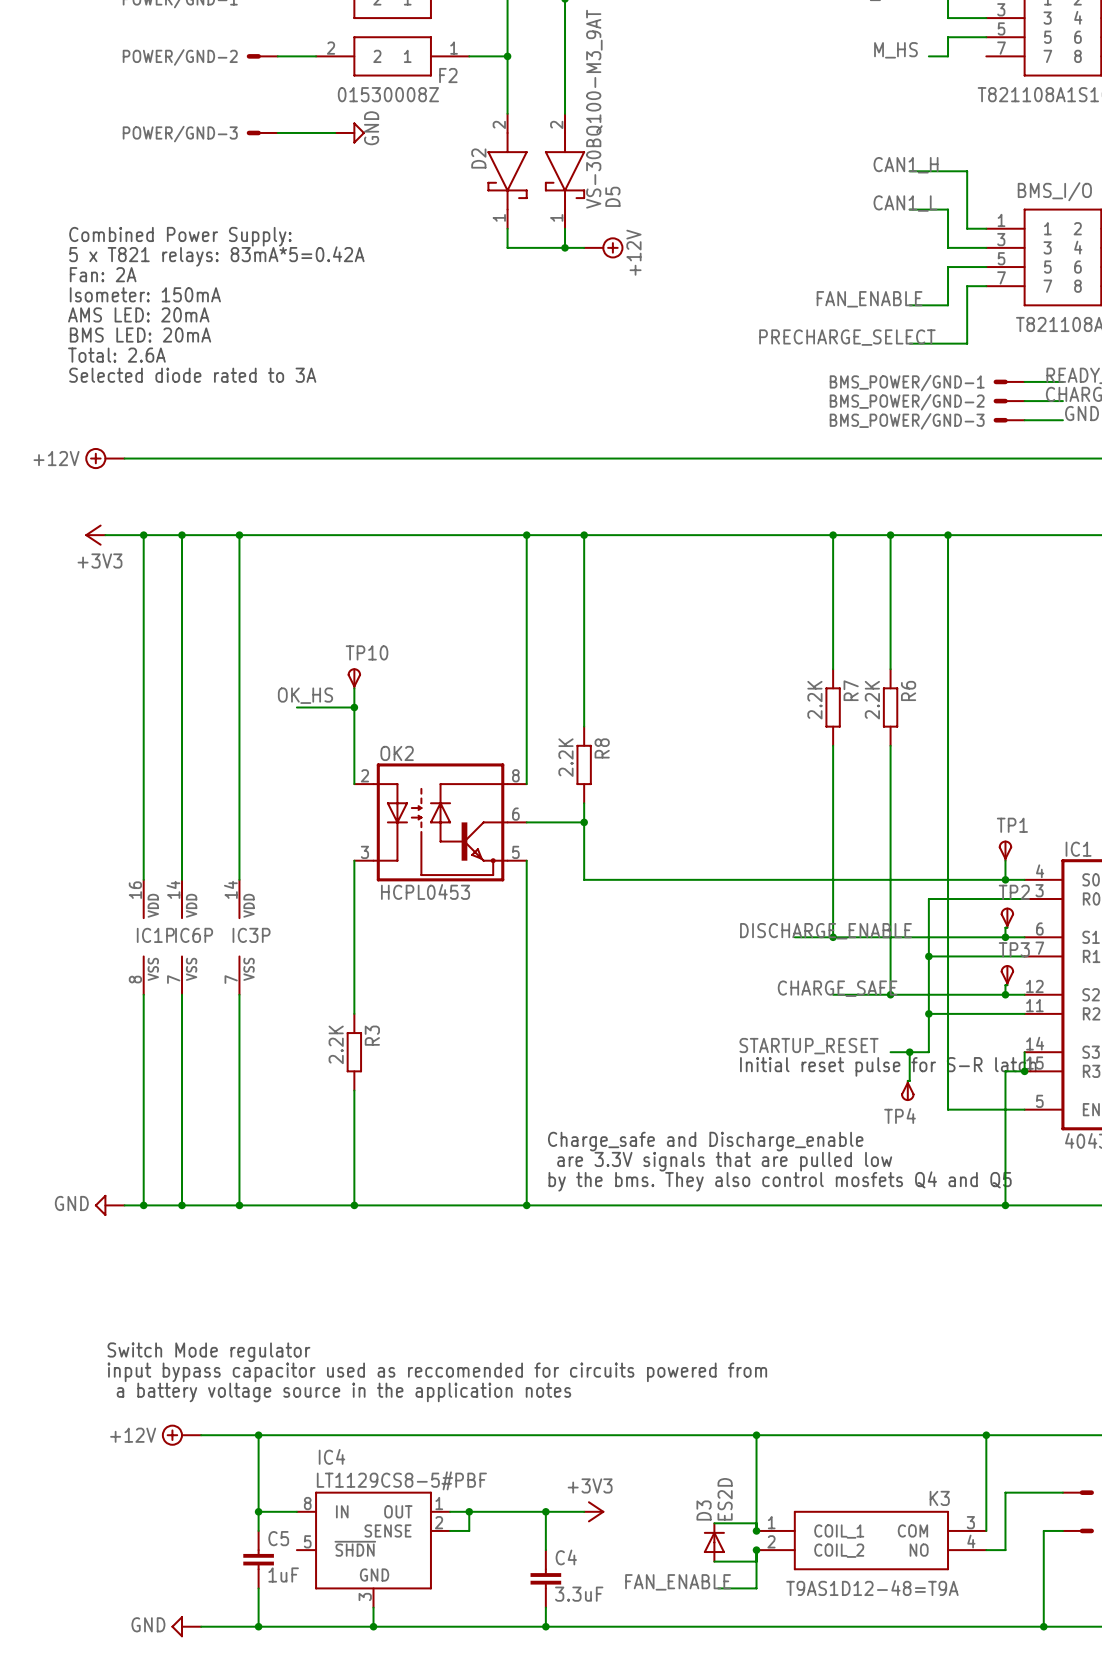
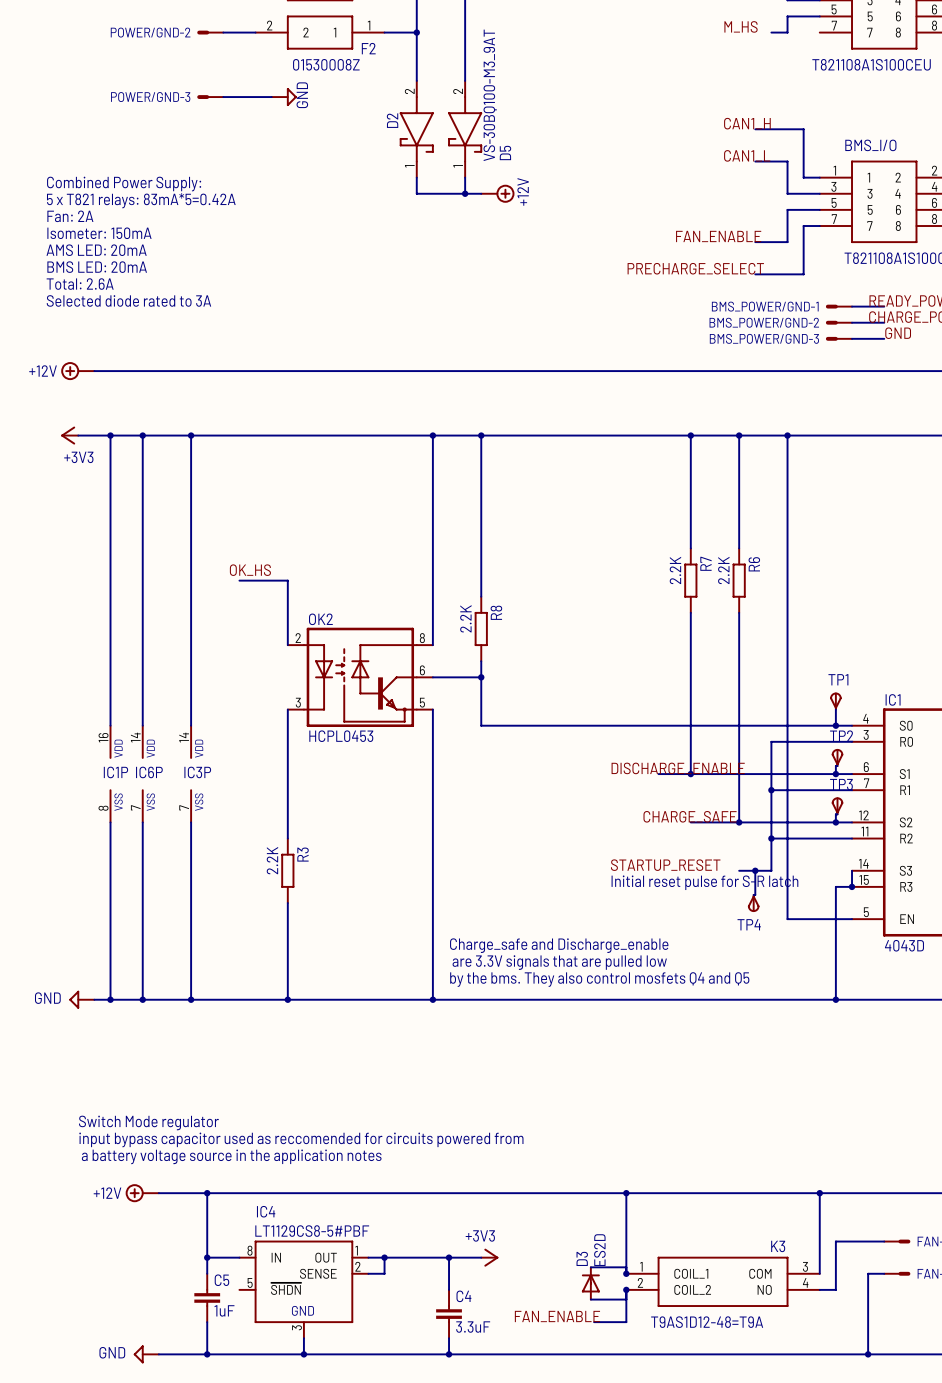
TP10: (354, 678) -> none
wire: (354, 688) (354, 707) -> none
junction: (354, 707) -> none

